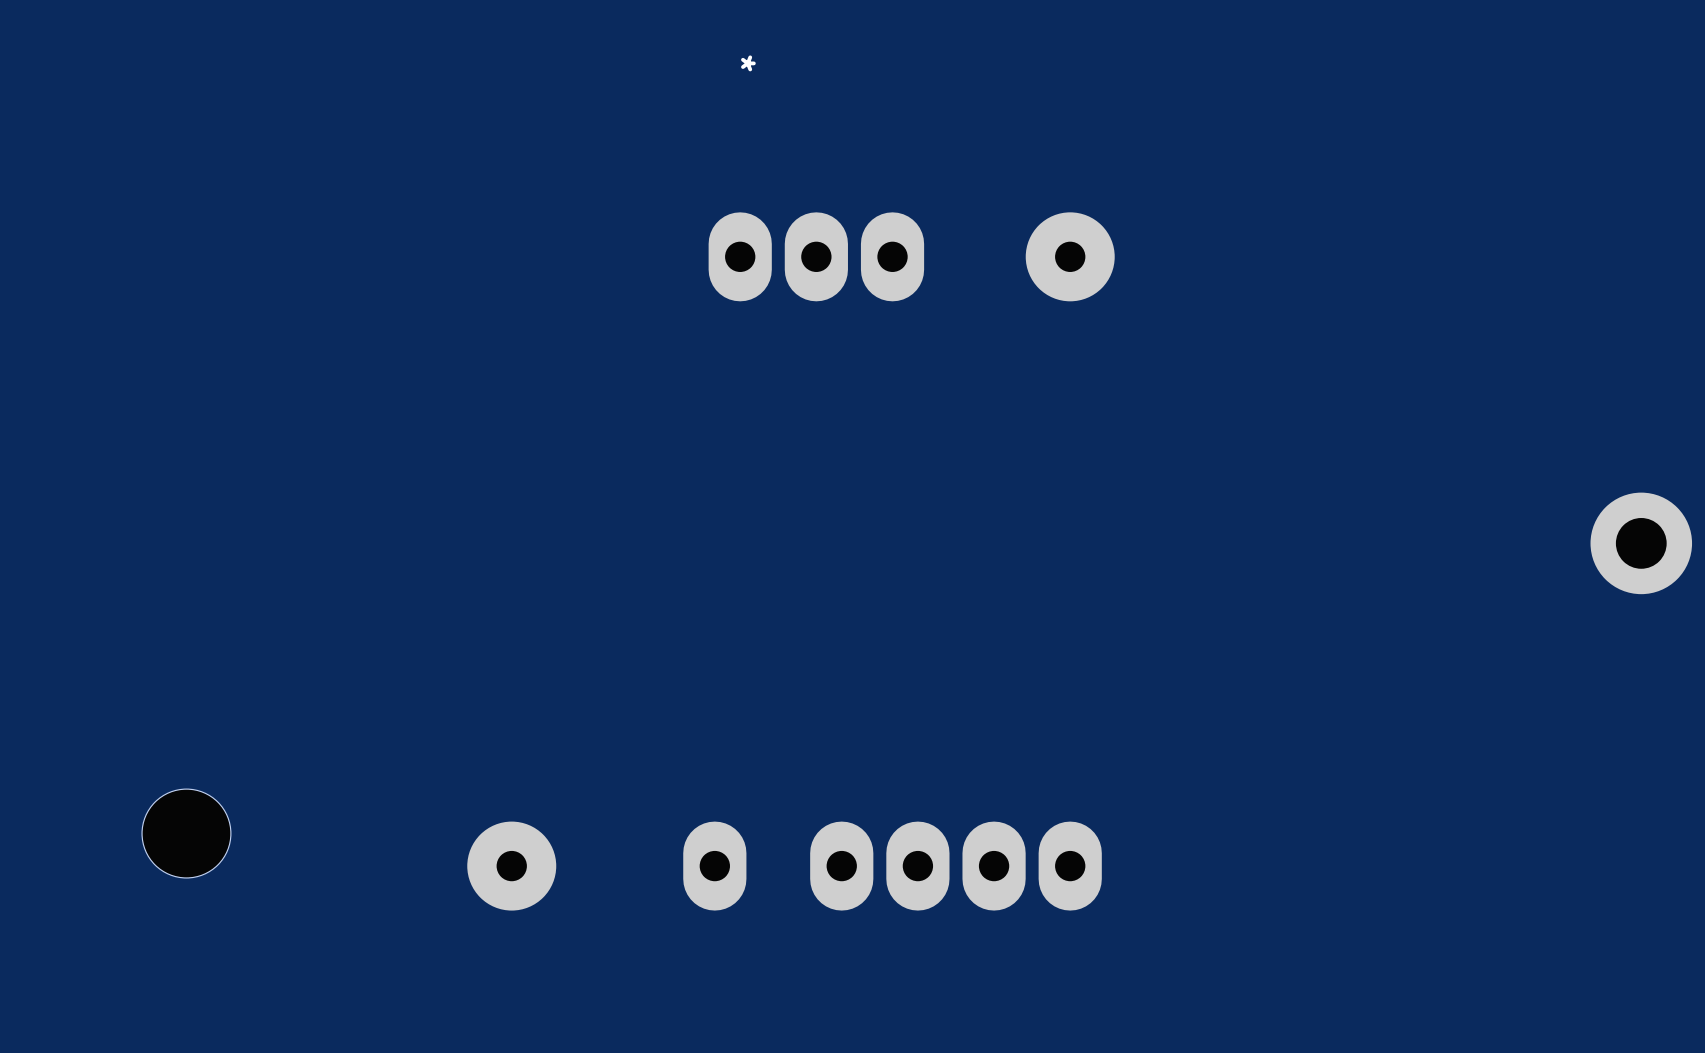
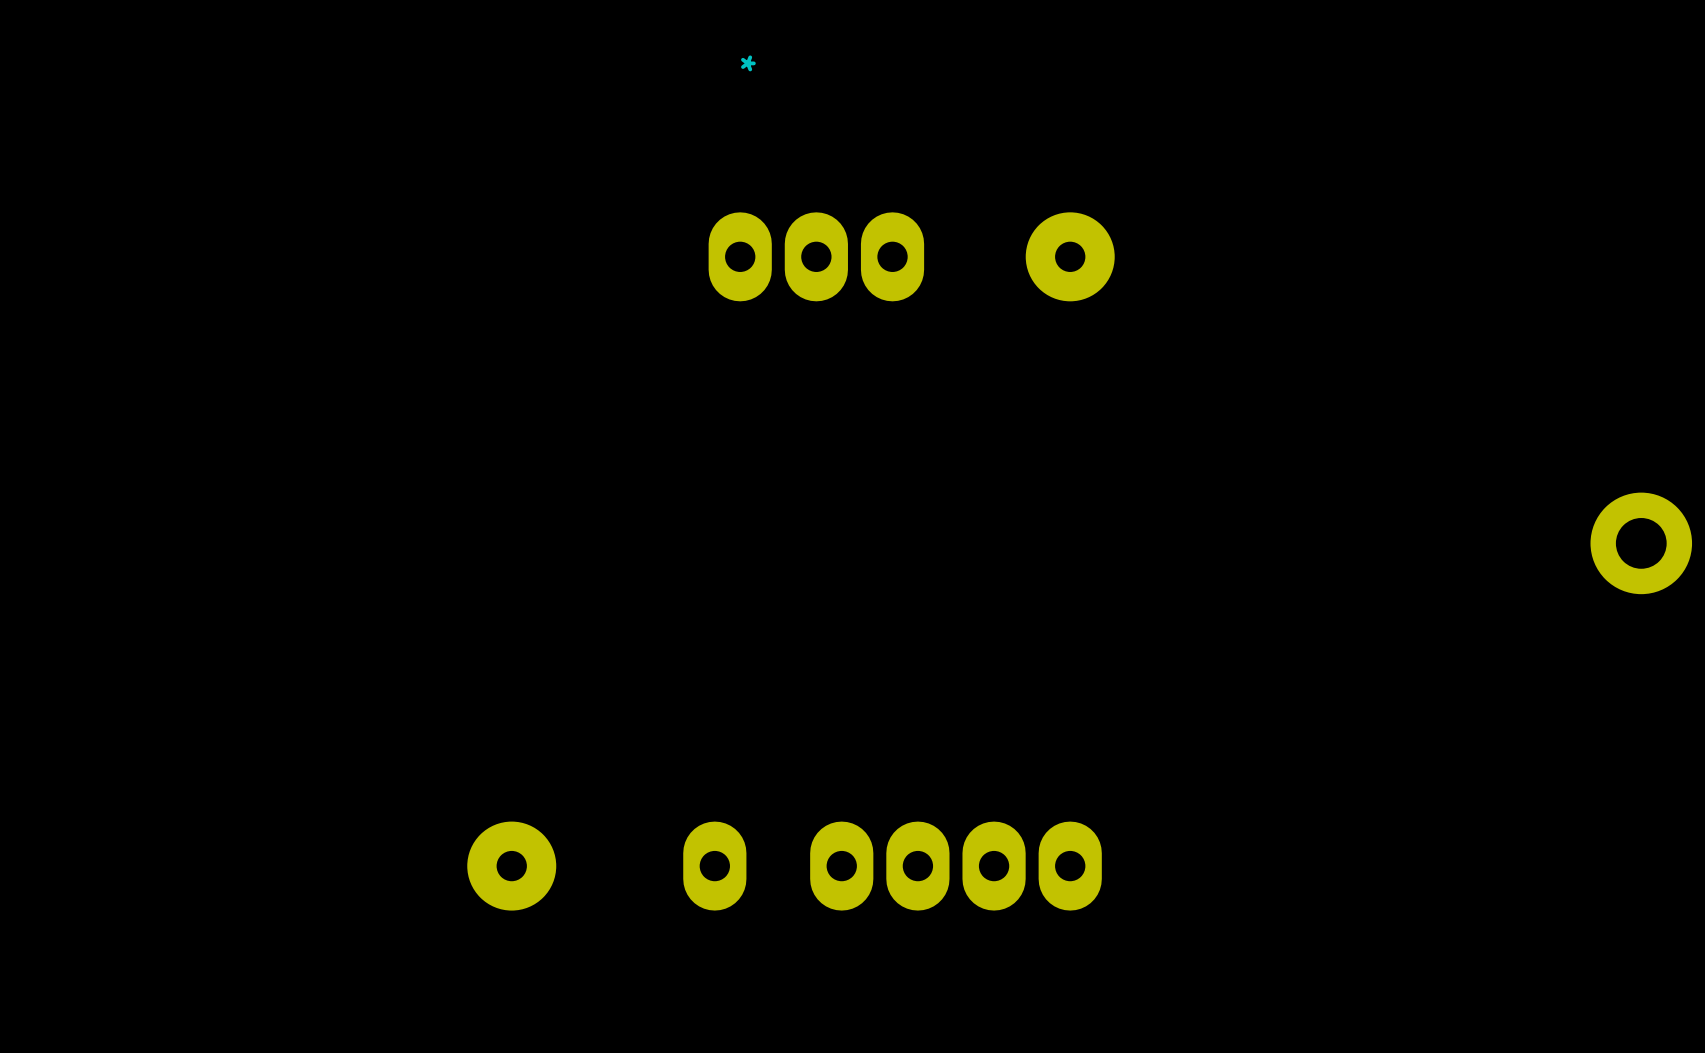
part: (186, 833) -> none

